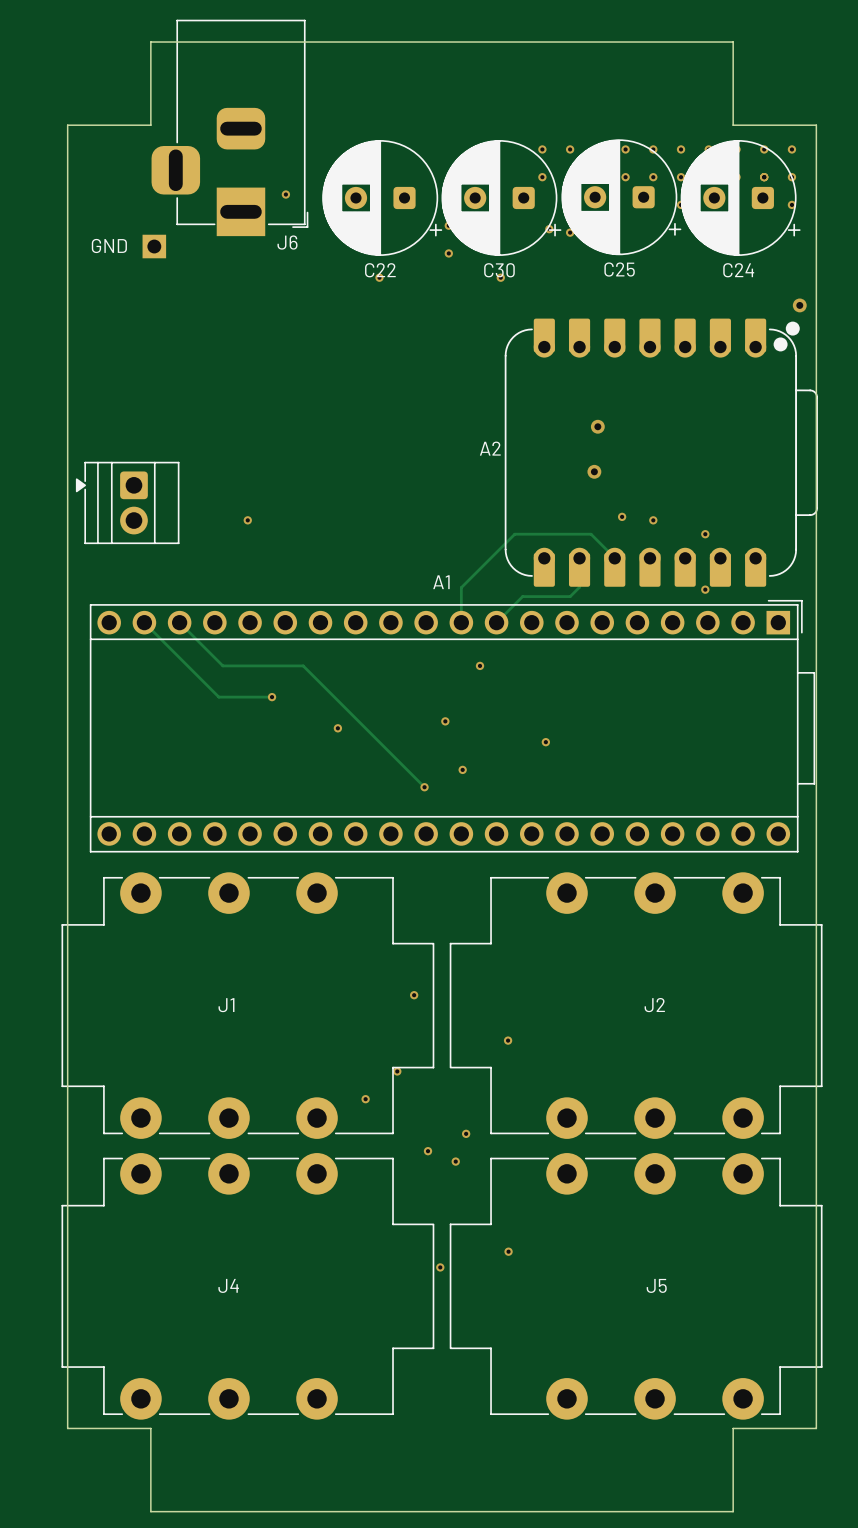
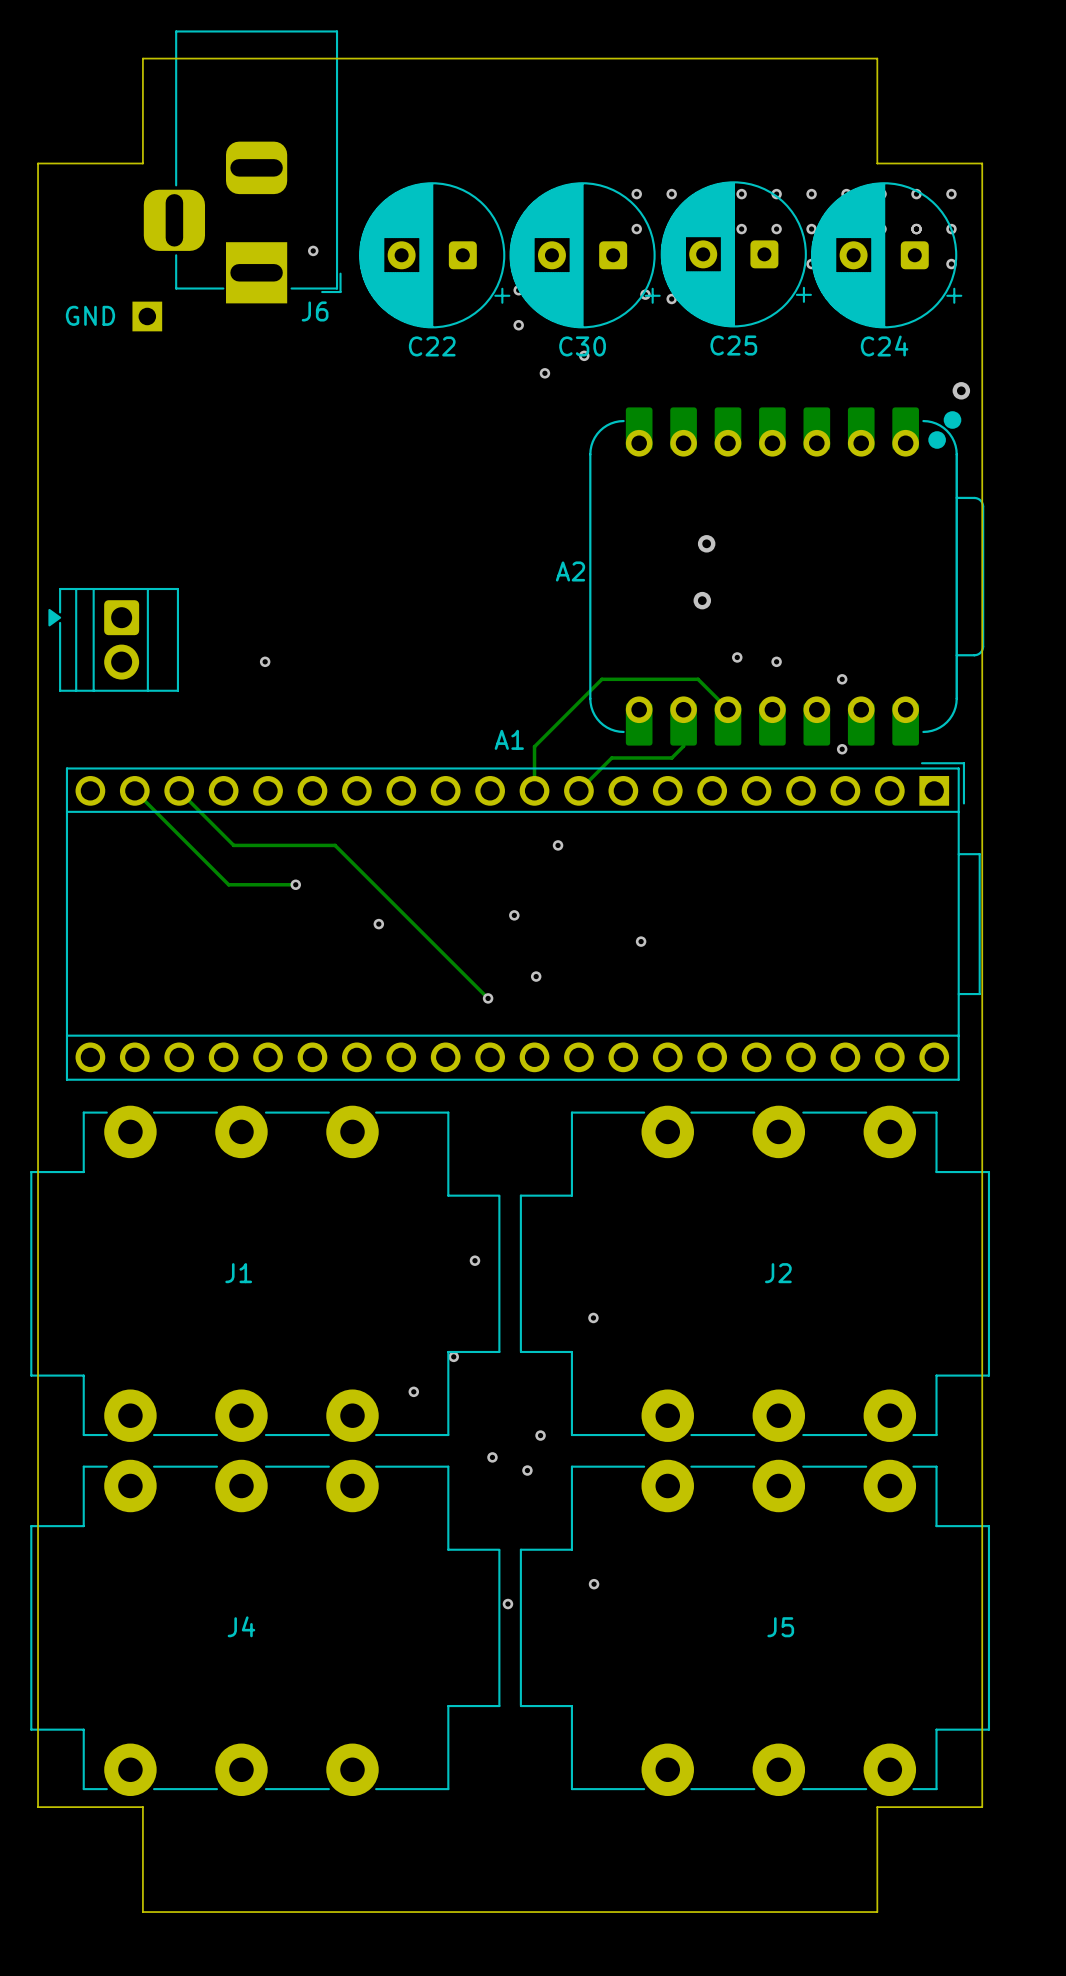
via: (379, 277) -> none
via: none -> (544, 373)

